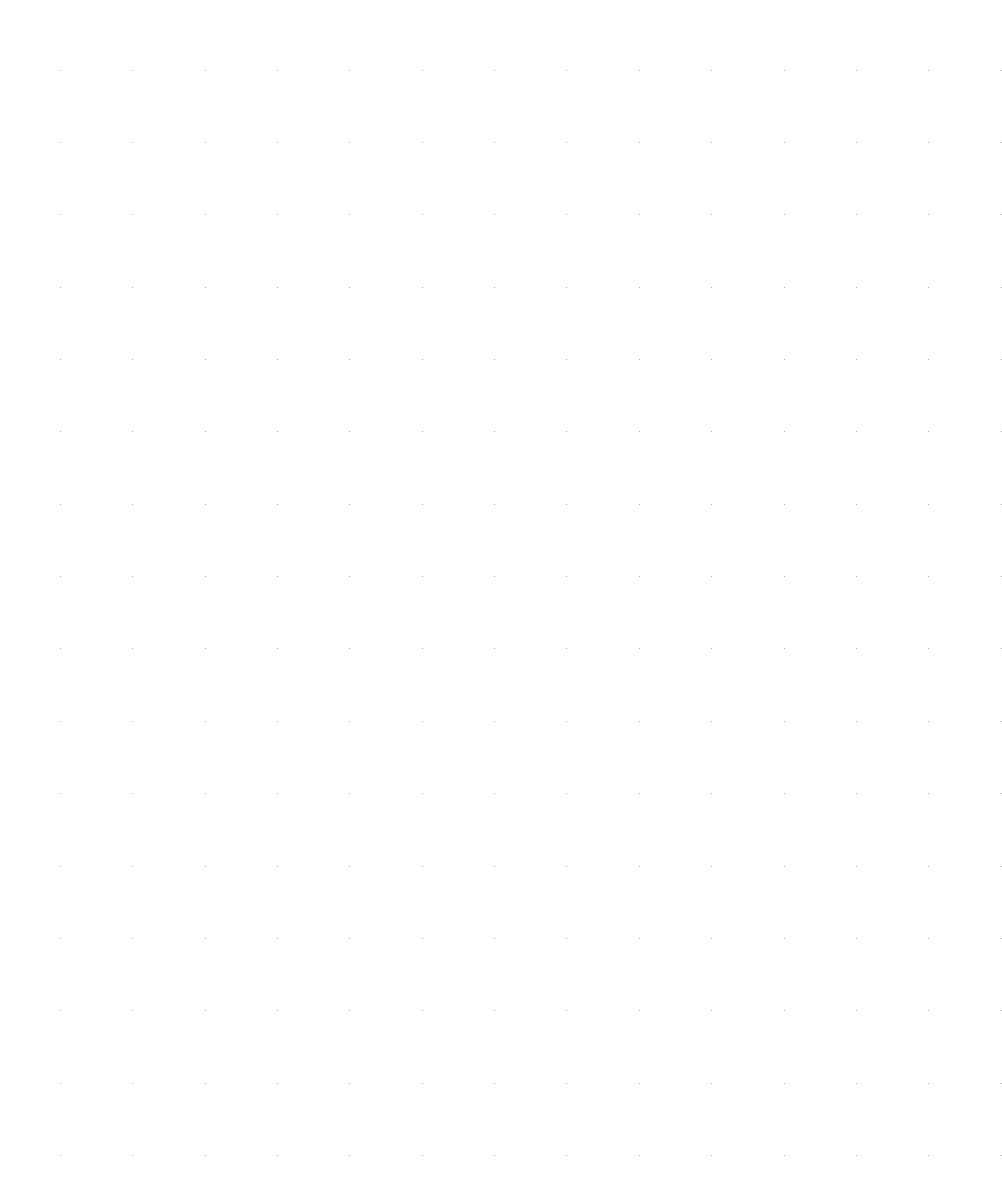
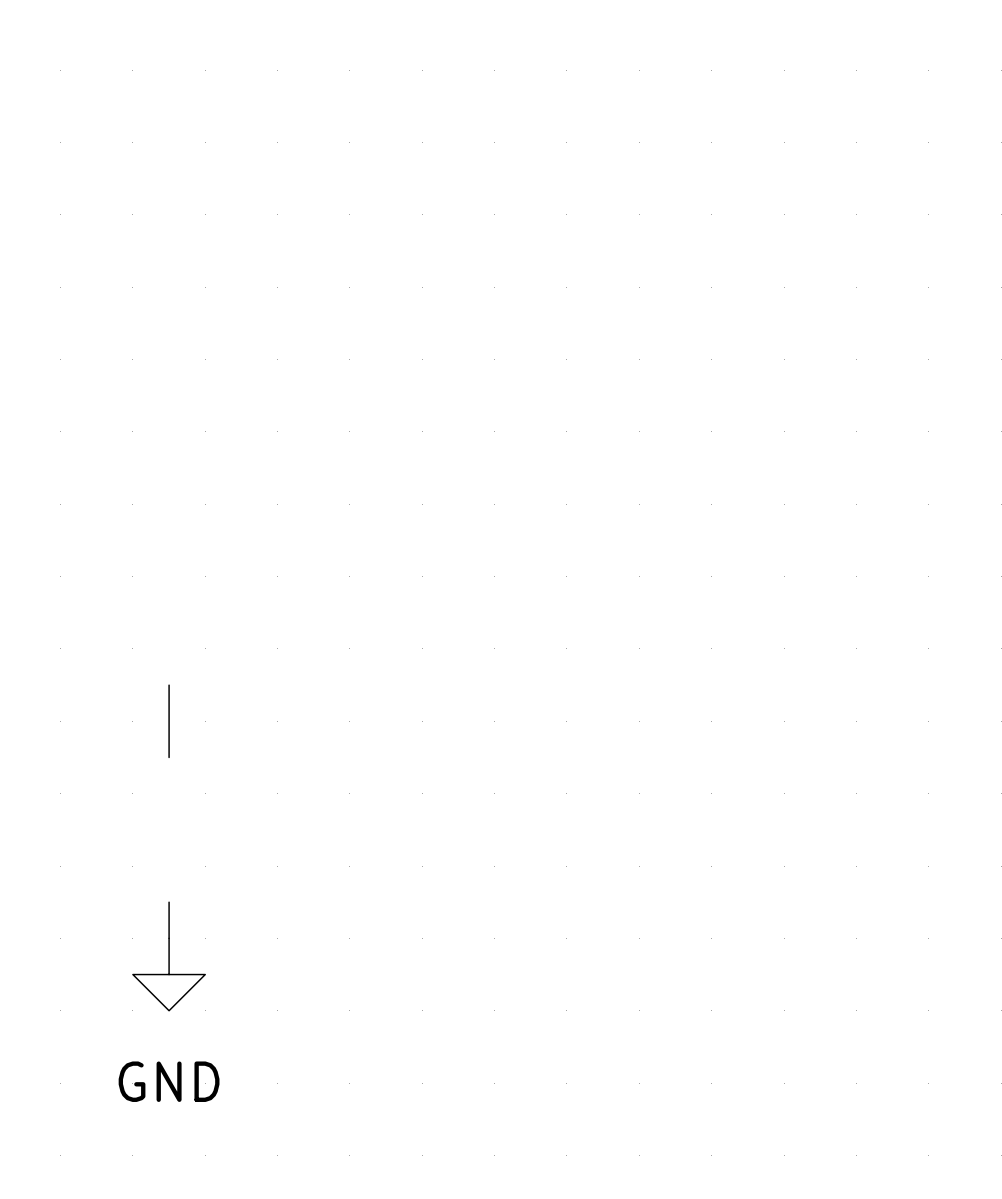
wire: none -> (169, 685) (169, 757)
wire: none -> (169, 902) (169, 938)
power symbol: none -> GND (169, 974)

